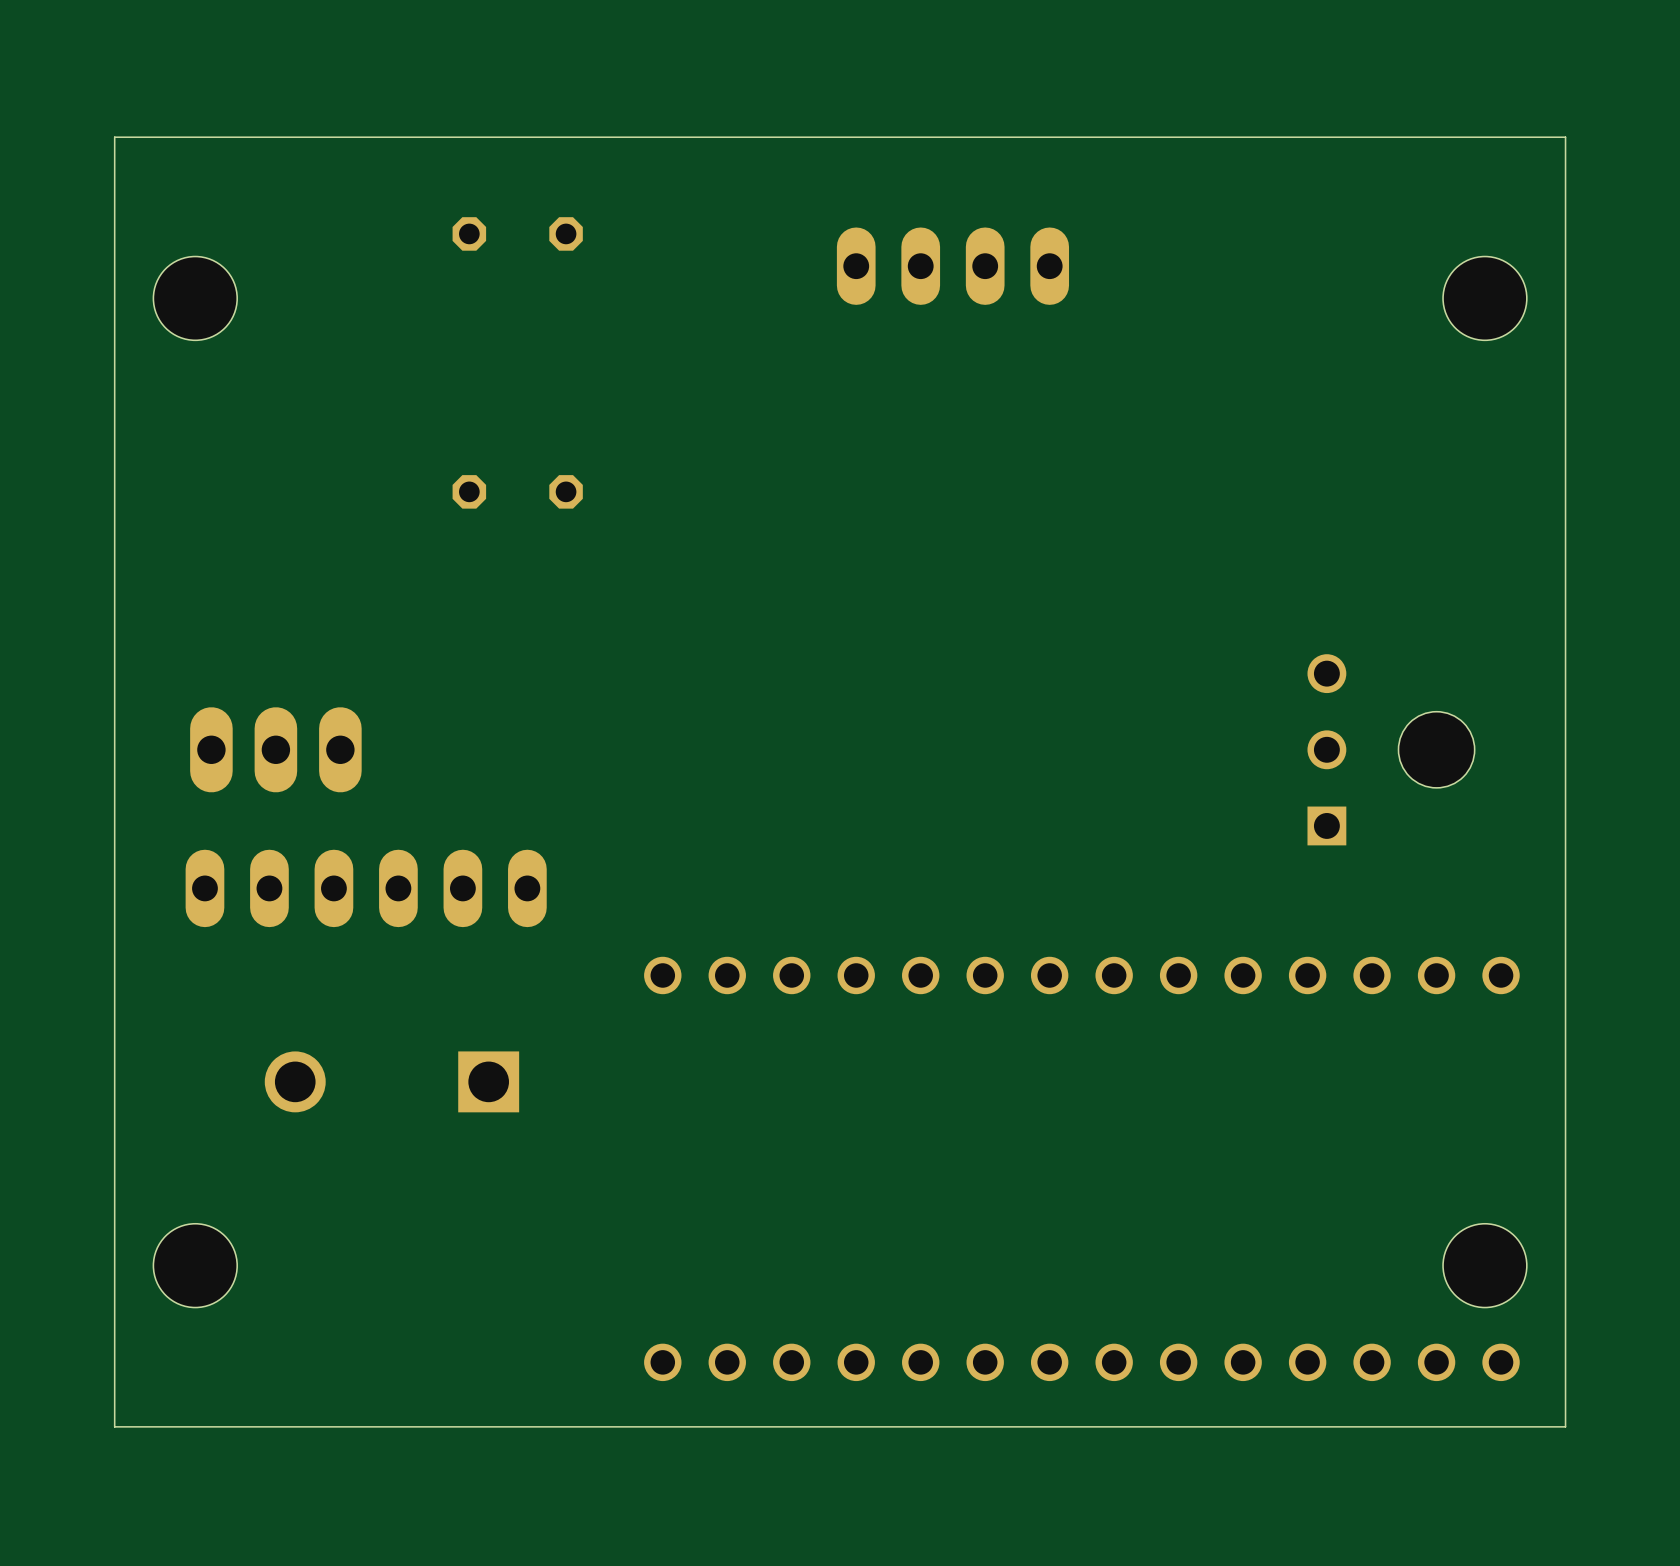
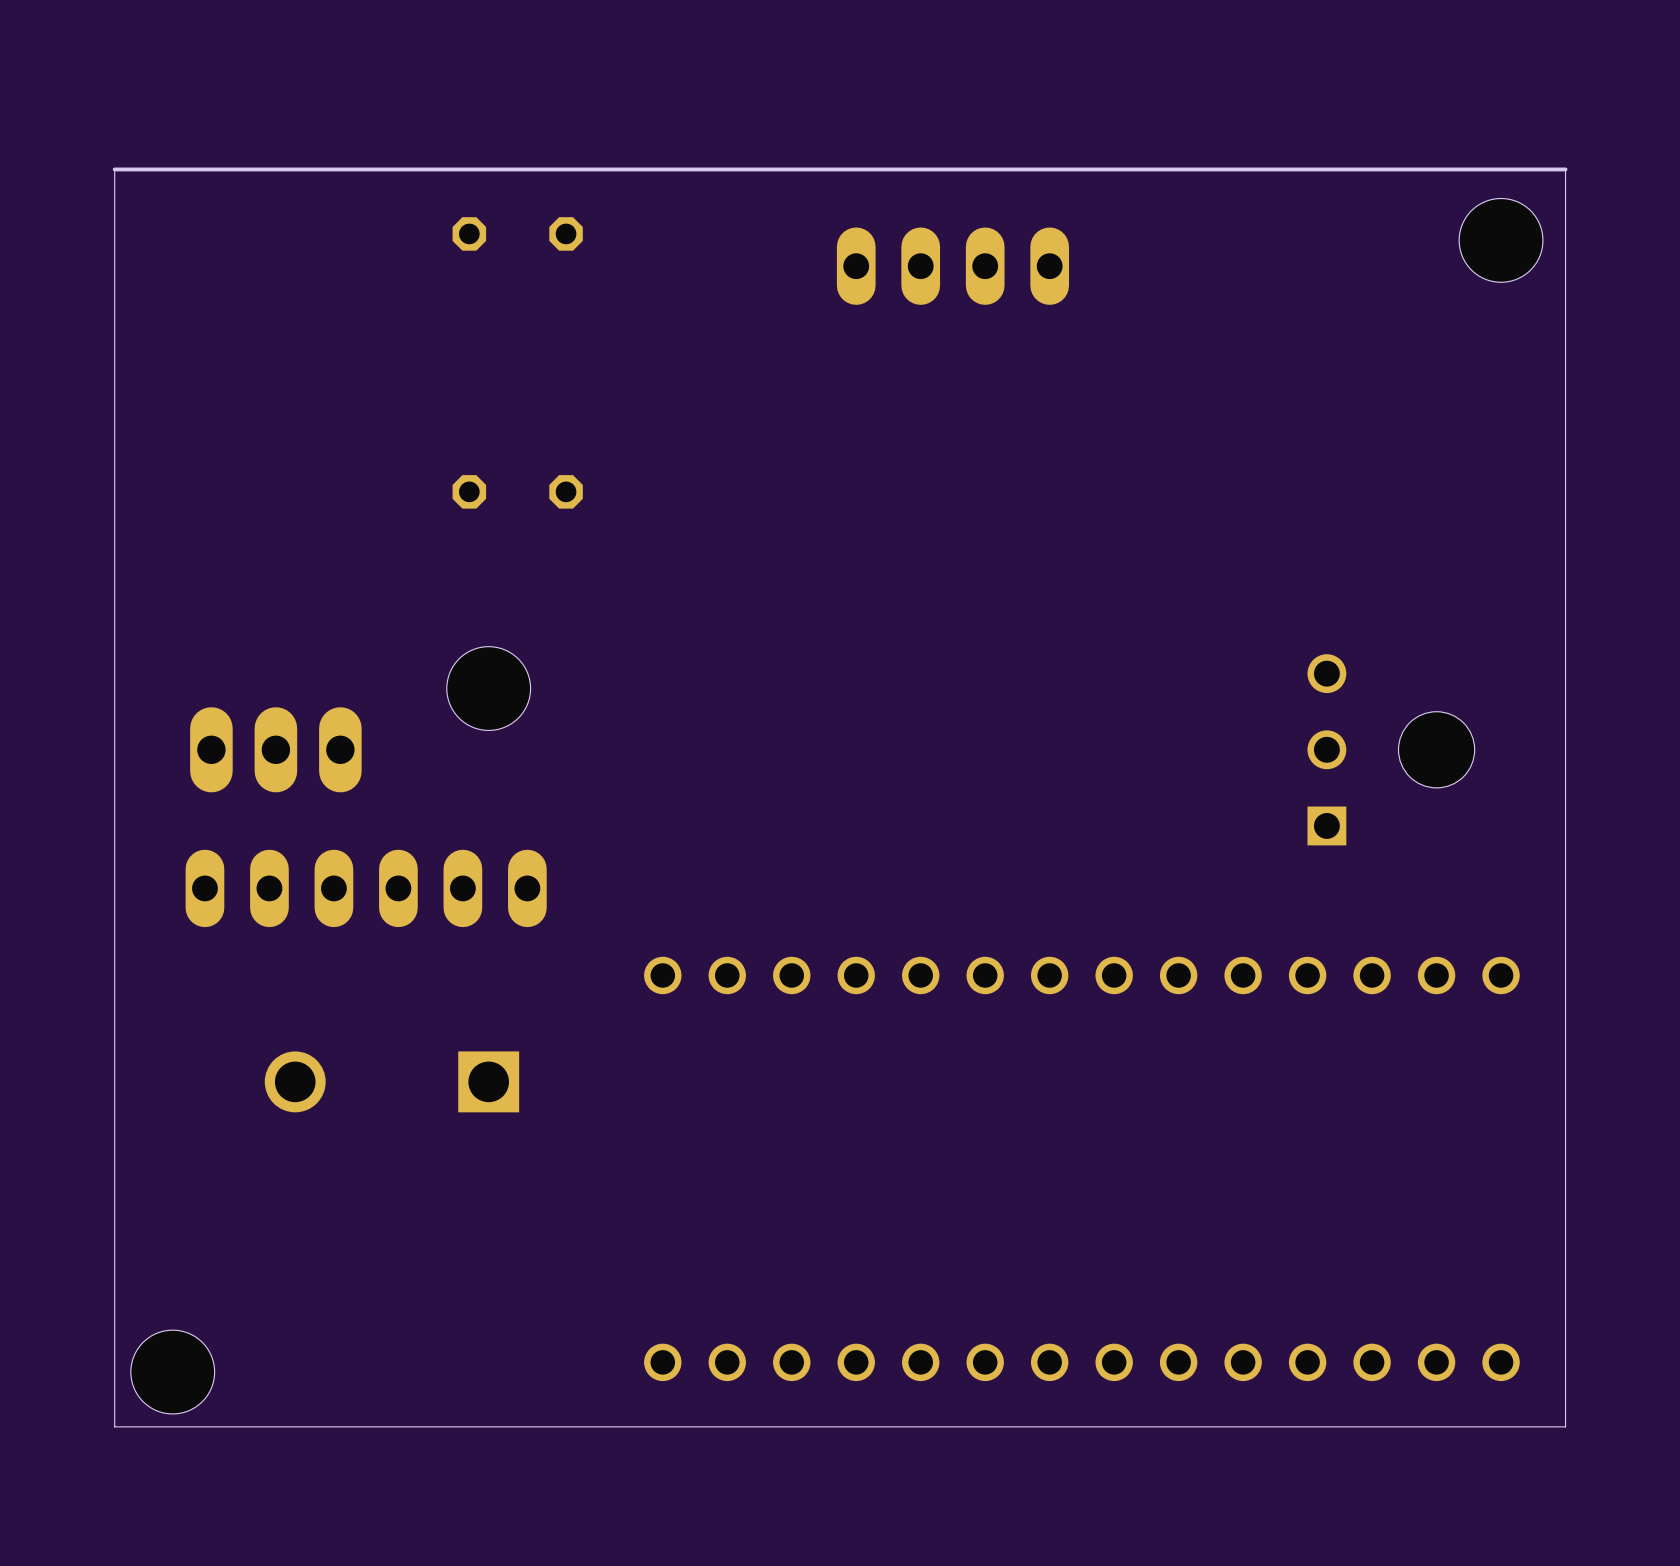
board edge: (1565, 169) (1565, 137) (114, 137) (114, 169) -> (1565, 169) (114, 169)
hole: (195, 298) -> none
hole position: (1484, 298) -> (1501, 240)
hole: none -> (488, 688)
hole position: (195, 1265) -> (172, 1372)
hole: (1484, 1265) -> none

